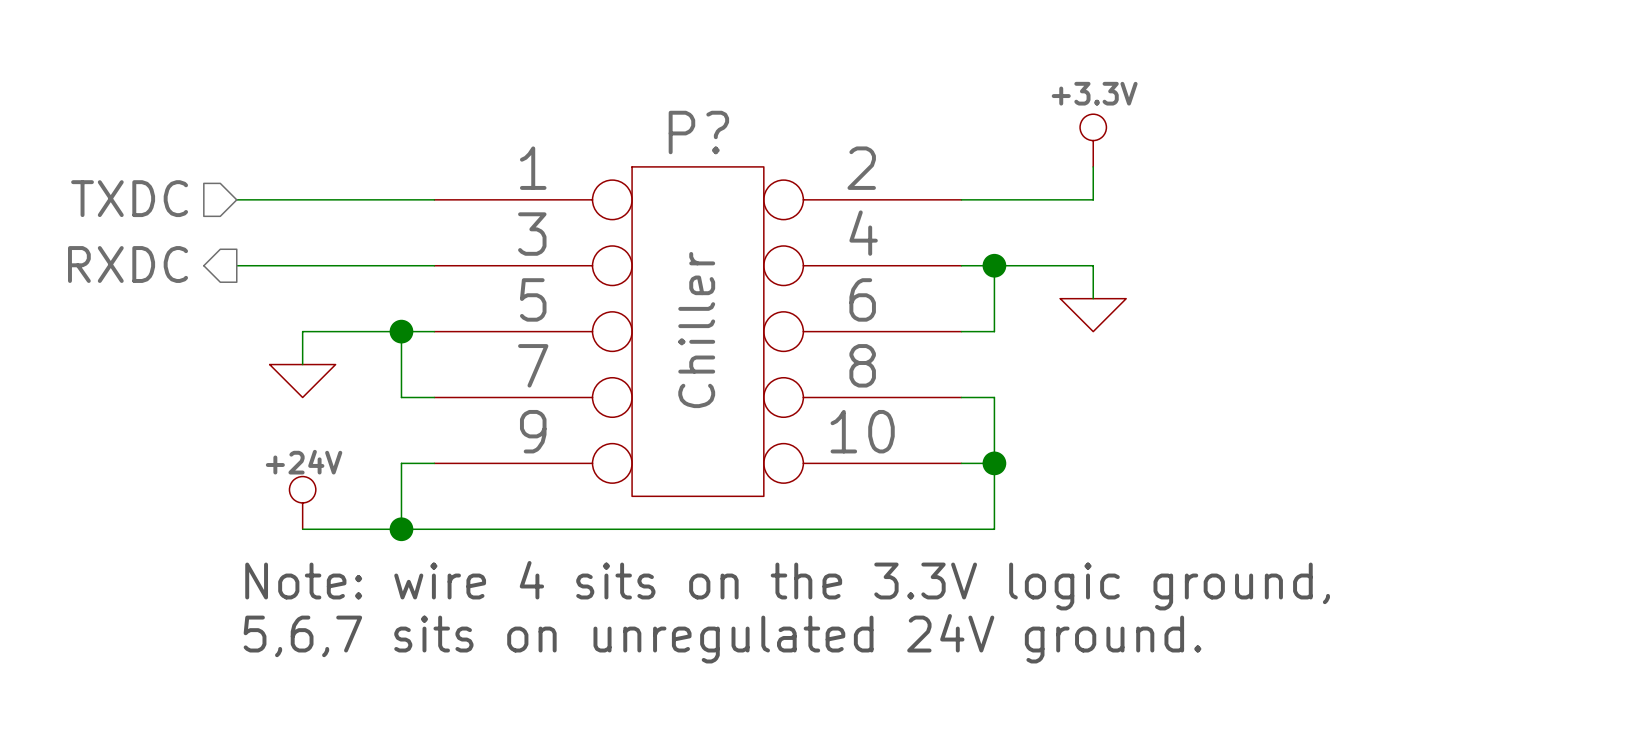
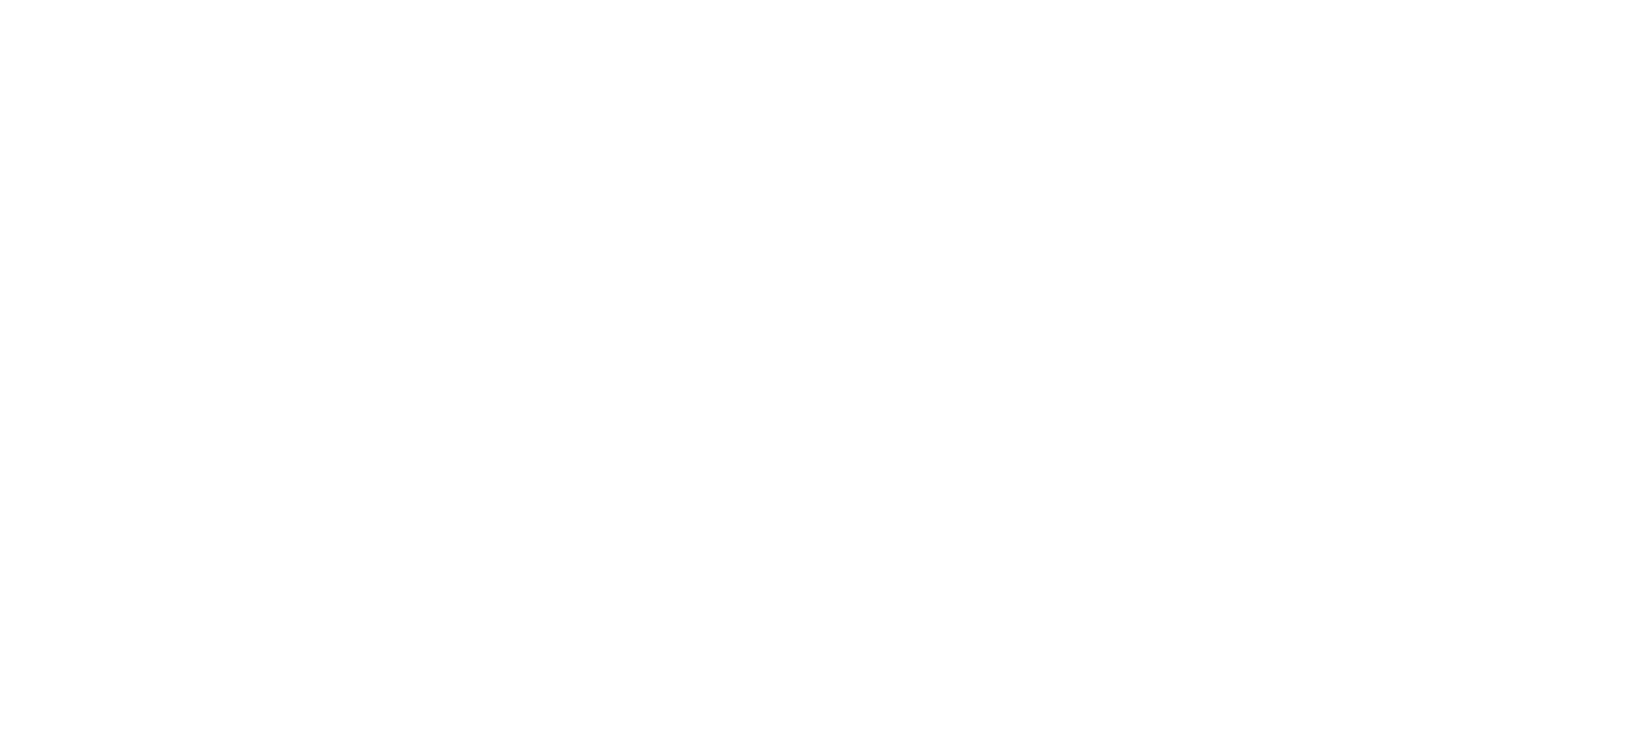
power symbol: +3.3V (1093, 140) -> none
wire: (1093, 166) (1093, 199) (961, 199) -> none
hierarchical label: TXDC (129, 198) -> none
wire: (236, 199) (434, 199) -> none
hierarchical label: RXDC (128, 264) -> none
wire: (236, 265) (434, 265) -> none
wire: (961, 265) (1093, 265) (1093, 298) -> none
wire: (994, 265) (994, 331) (961, 331) -> none
junction: (994, 265) -> none
power symbol: (1093, 315) -> none
wire: (401, 331) (401, 397) (434, 397) -> none
junction: (401, 331) -> none
wire: (434, 331) (302, 331) (302, 364) -> none
P?: Chiller (697, 331) -> none
power symbol: (302, 381) -> none
wire: (961, 397) (994, 397) (994, 529) (302, 529) -> none
wire: (434, 463) (401, 463) (401, 529) -> none
wire: (961, 463) (994, 463) -> none
junction: (994, 463) -> none
power symbol: +24V (302, 502) -> none
junction: (401, 529) -> none
text: Note: wire 4 sits on the 3.3V logic ground, (787, 585) -> none
text: 5,6,7 sits on unregulated 24V ground. (722, 638) -> none

